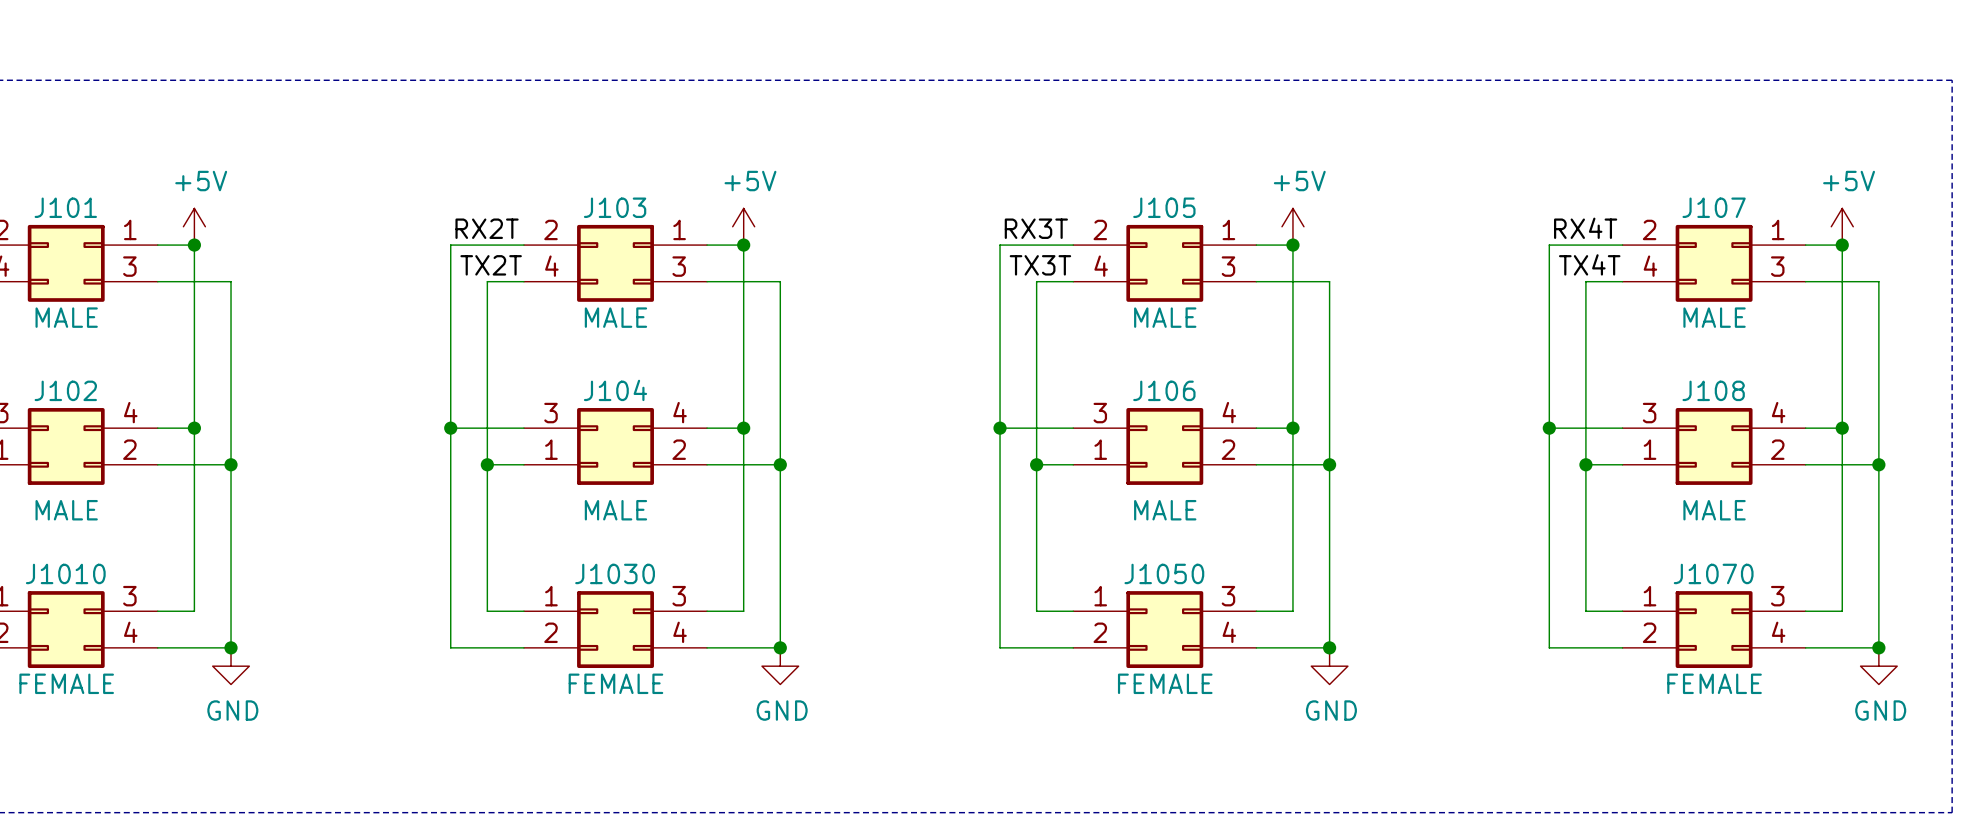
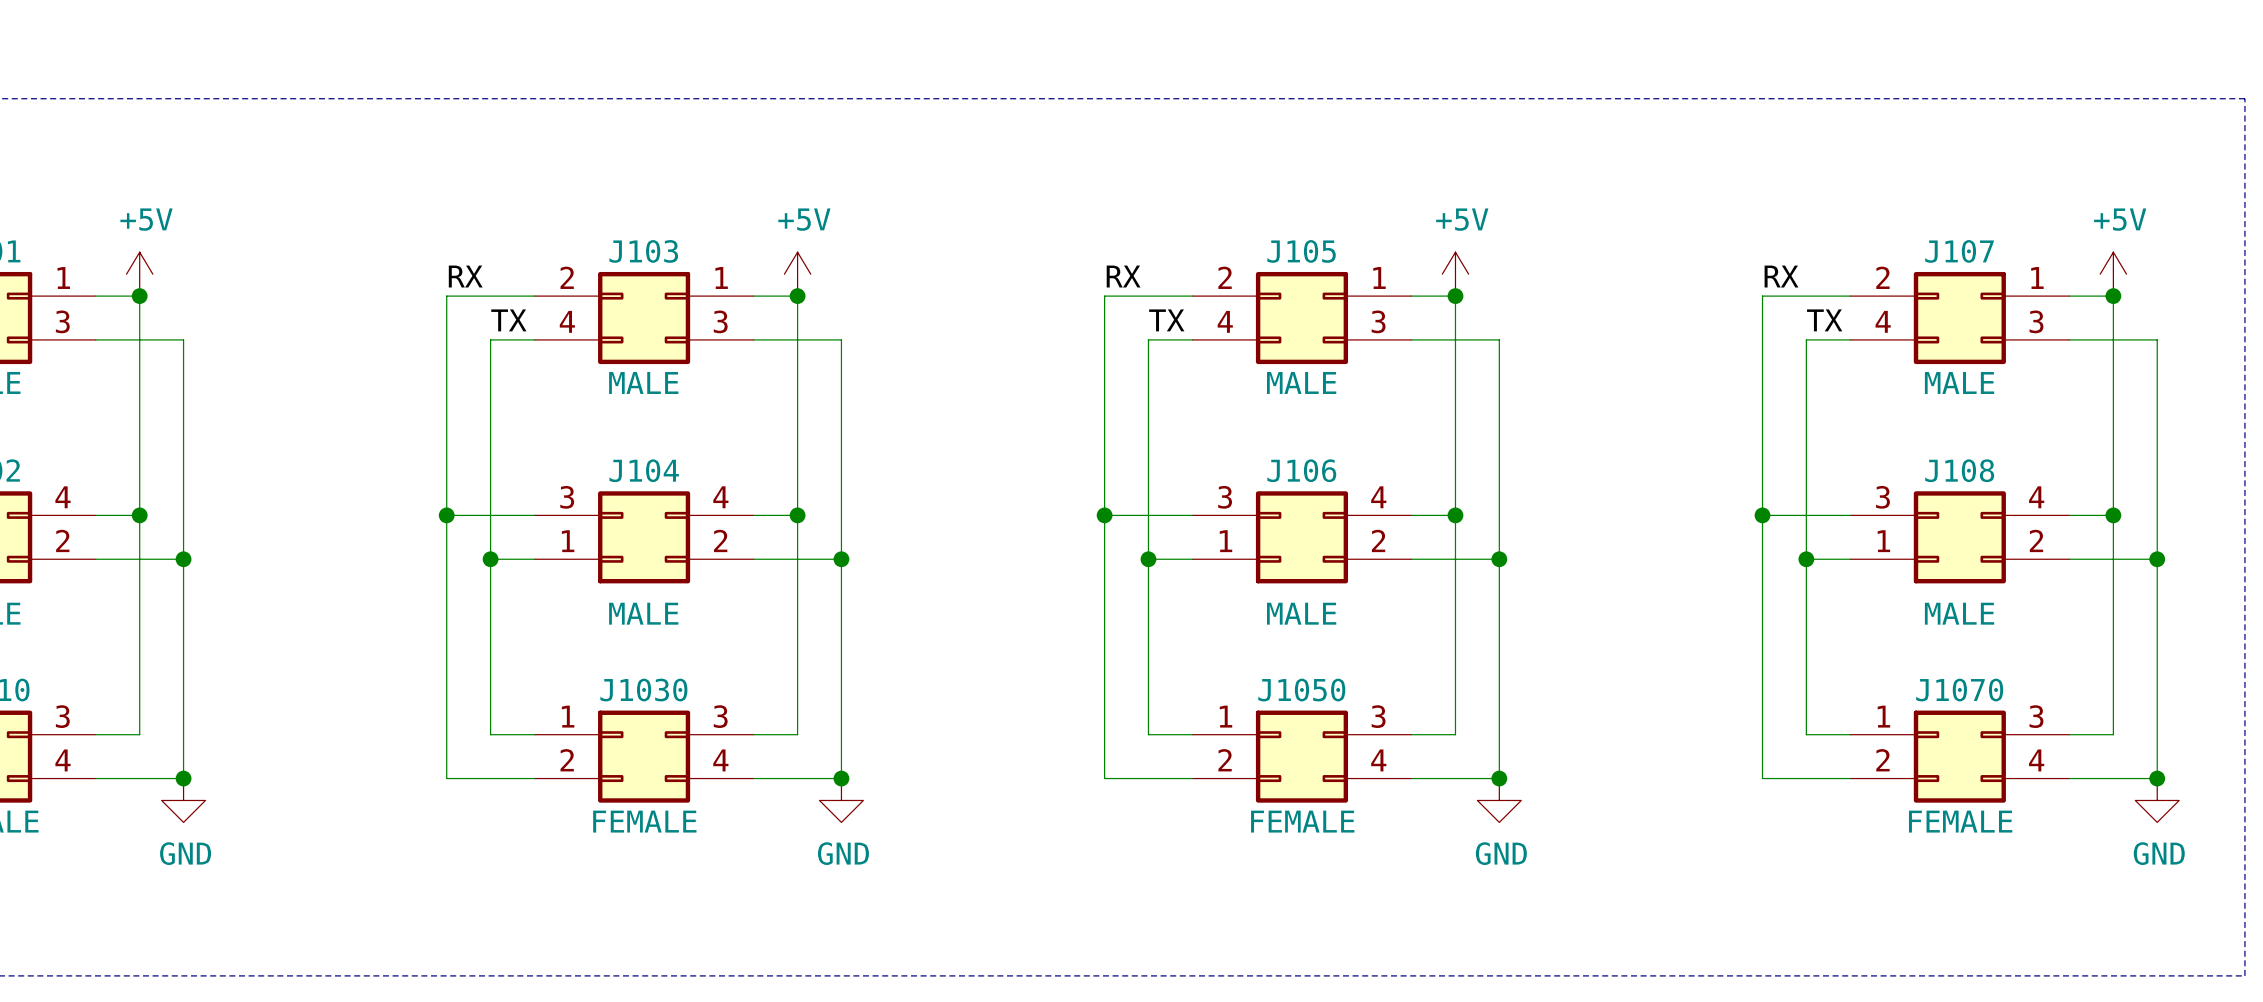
label: RX2T (487, 228) -> RX (465, 276)
label: RX3T (1036, 228) -> RX (1123, 276)
label: RX4T (1585, 228) -> RX (1781, 276)
label: TX4T (1589, 264) -> TX (1824, 320)
label: TX2T (491, 265) -> TX (508, 320)
label: TX3T (1040, 265) -> TX (1166, 320)

